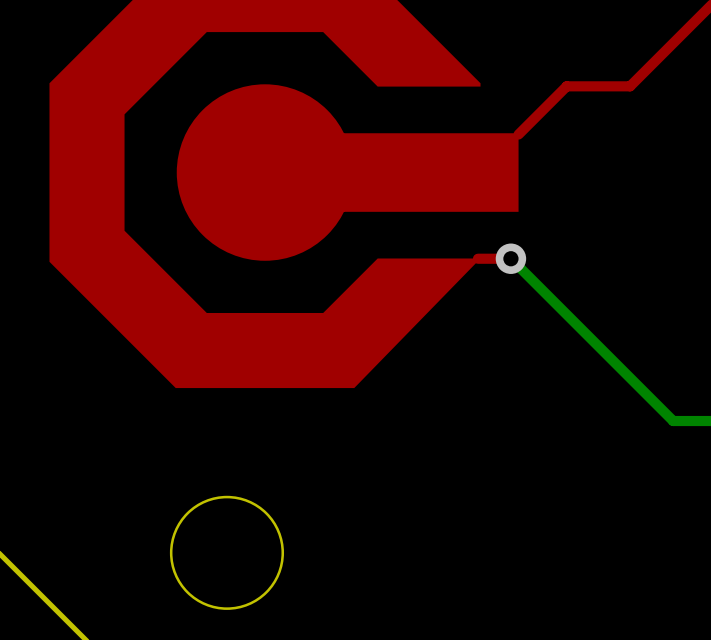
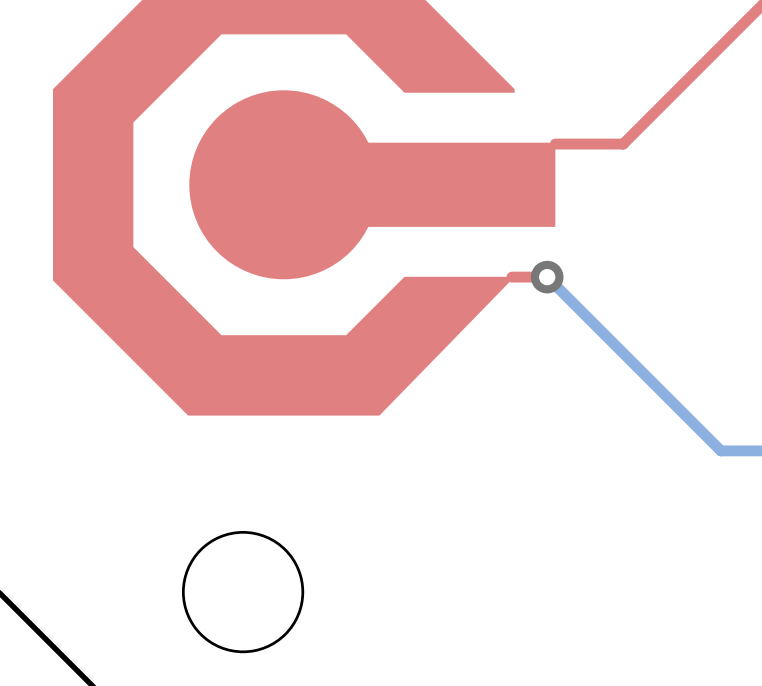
top track: (630, 86) (566, 86) (518, 134) -> (674, 92) (623, 144) (555, 144)

